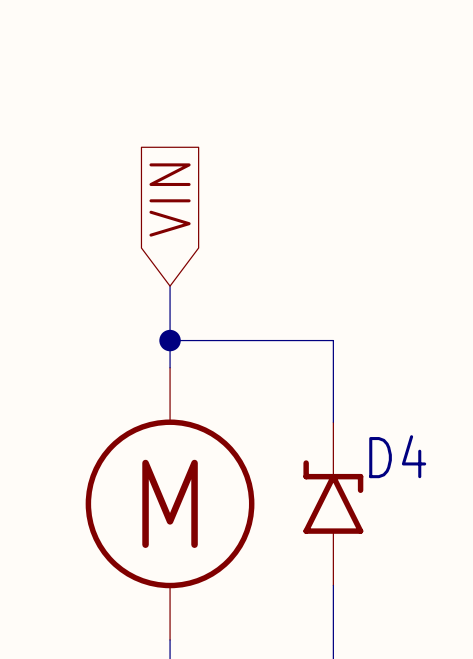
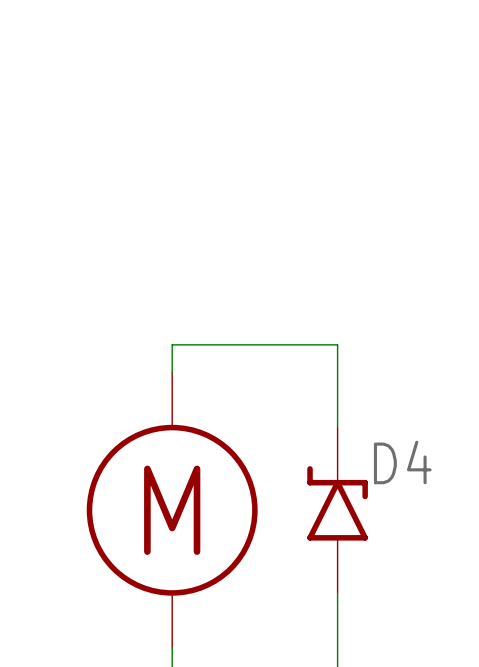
global label: VIN (170, 199) -> none
wire: (170, 286) (170, 340) -> none
junction: (170, 340) -> none

